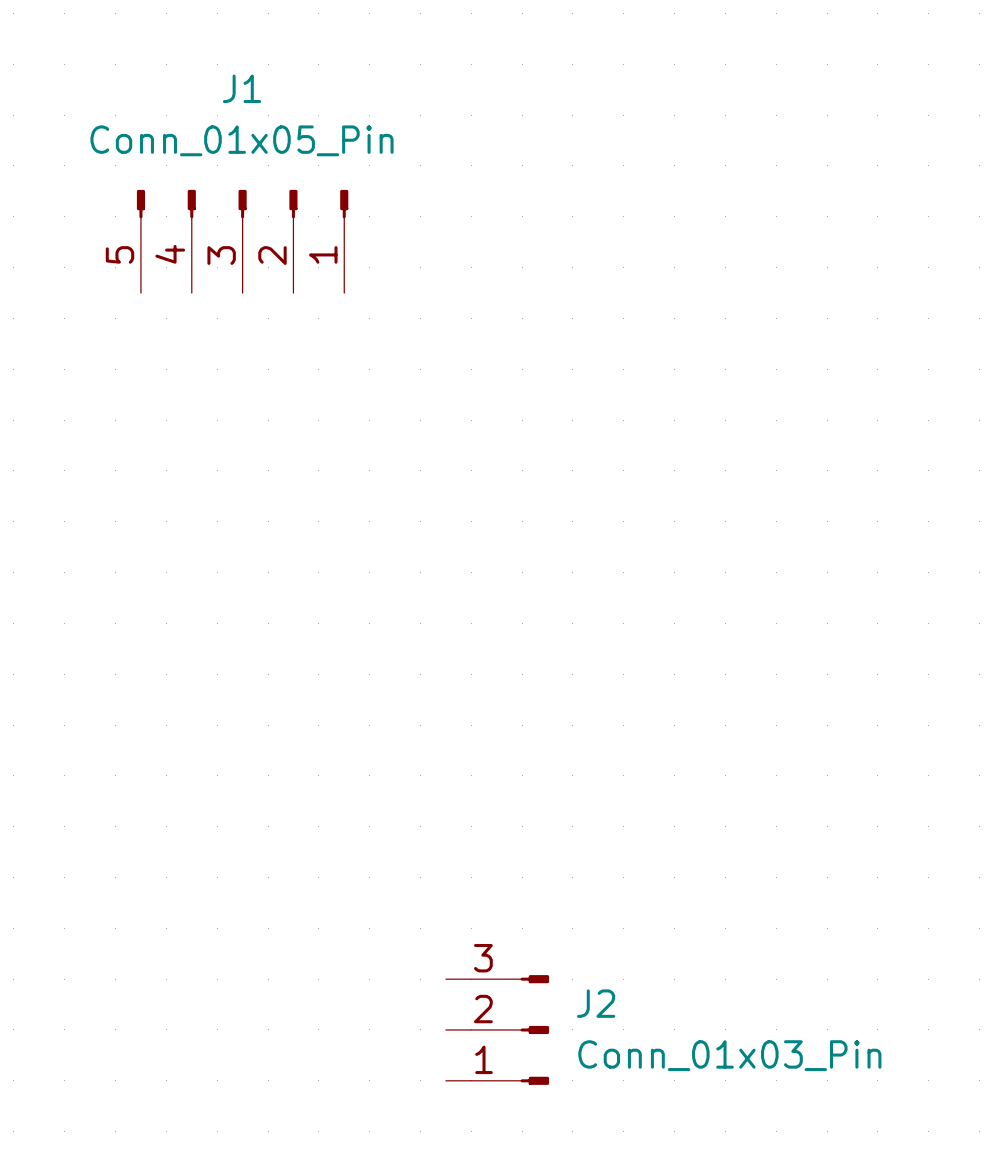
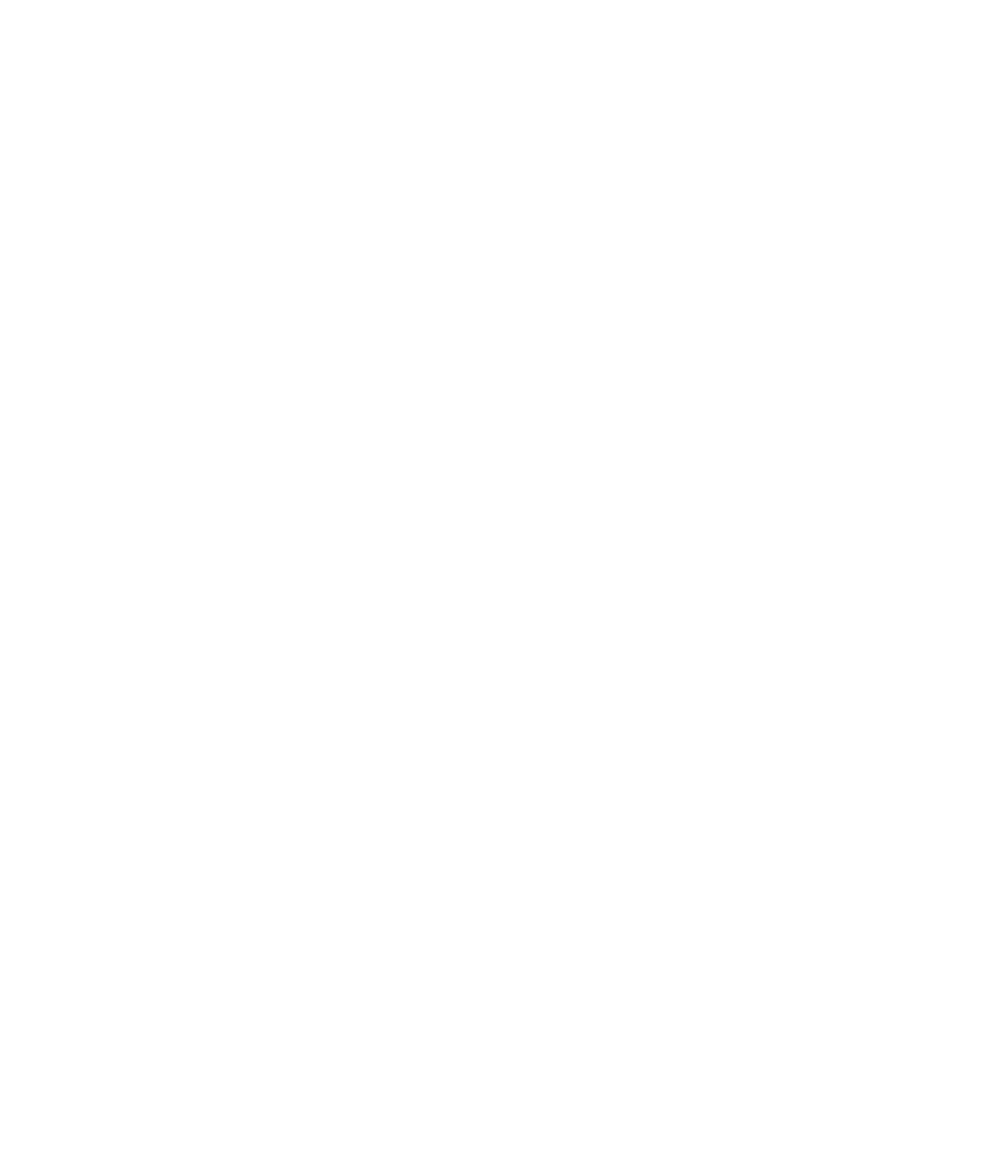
J1: Conn_01x05_Pin (242, 241) -> none
J2: Conn_01x03_Pin (497, 1029) -> none

